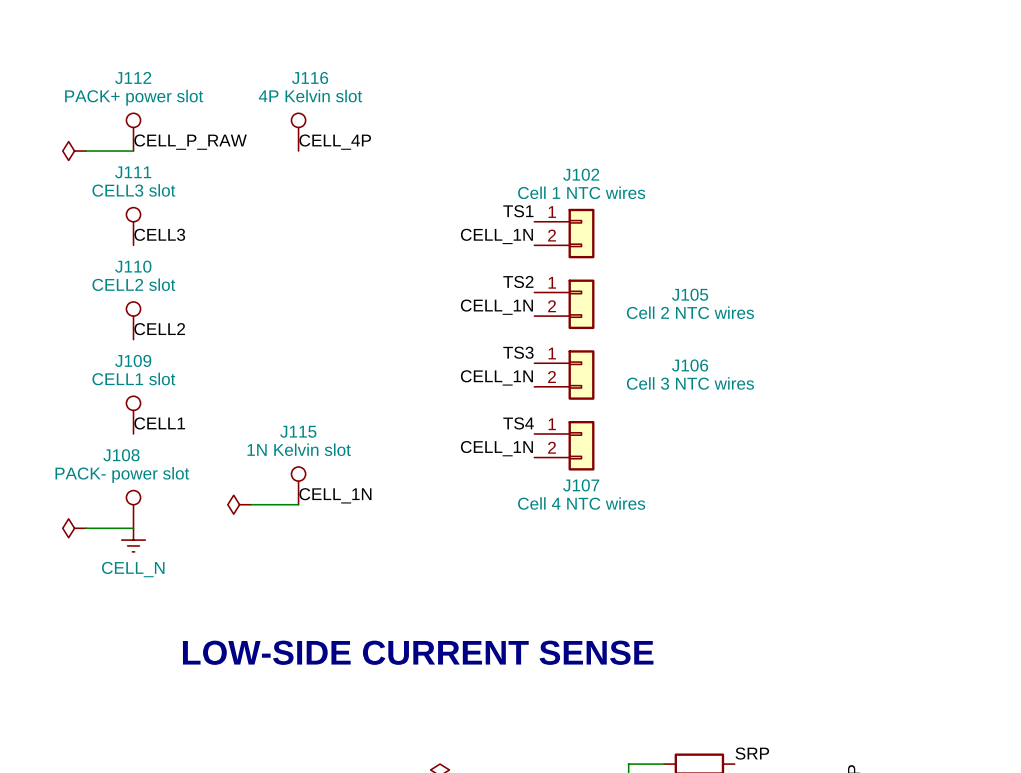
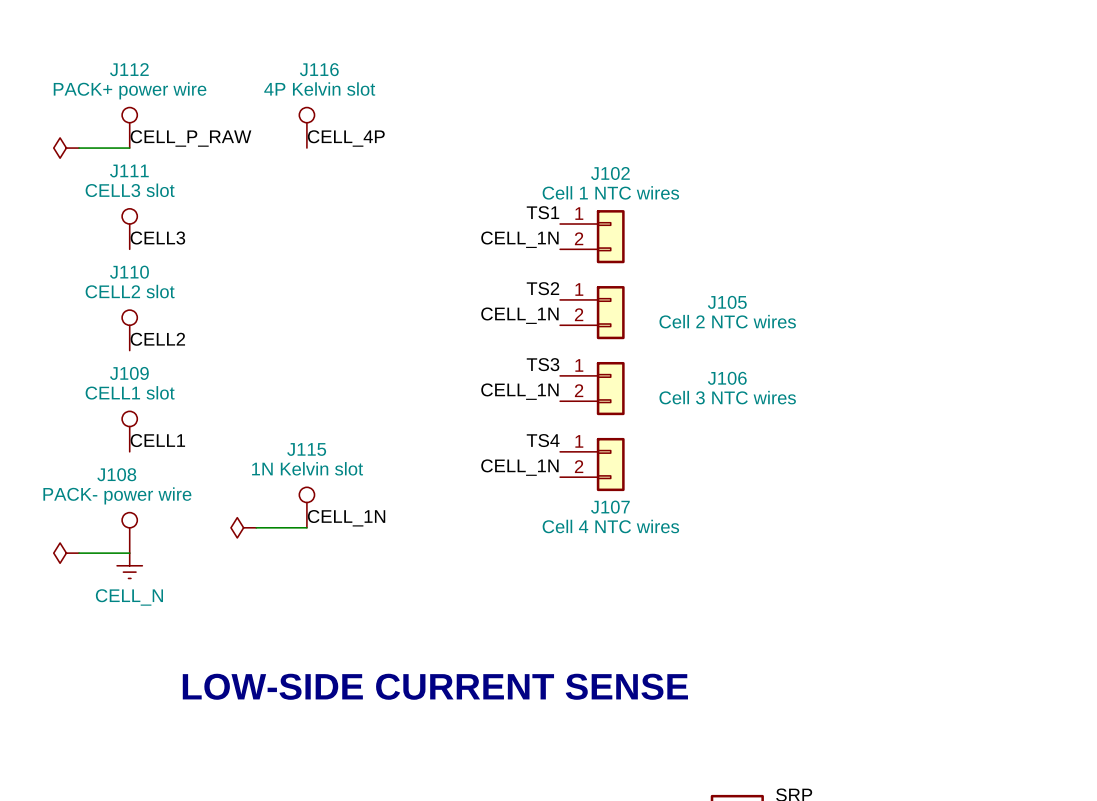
J112 value: PACK+ power slot (134, 97) -> PACK+ power wire (130, 90)
J108 value: PACK- power slot (122, 475) -> PACK- power wire (117, 495)

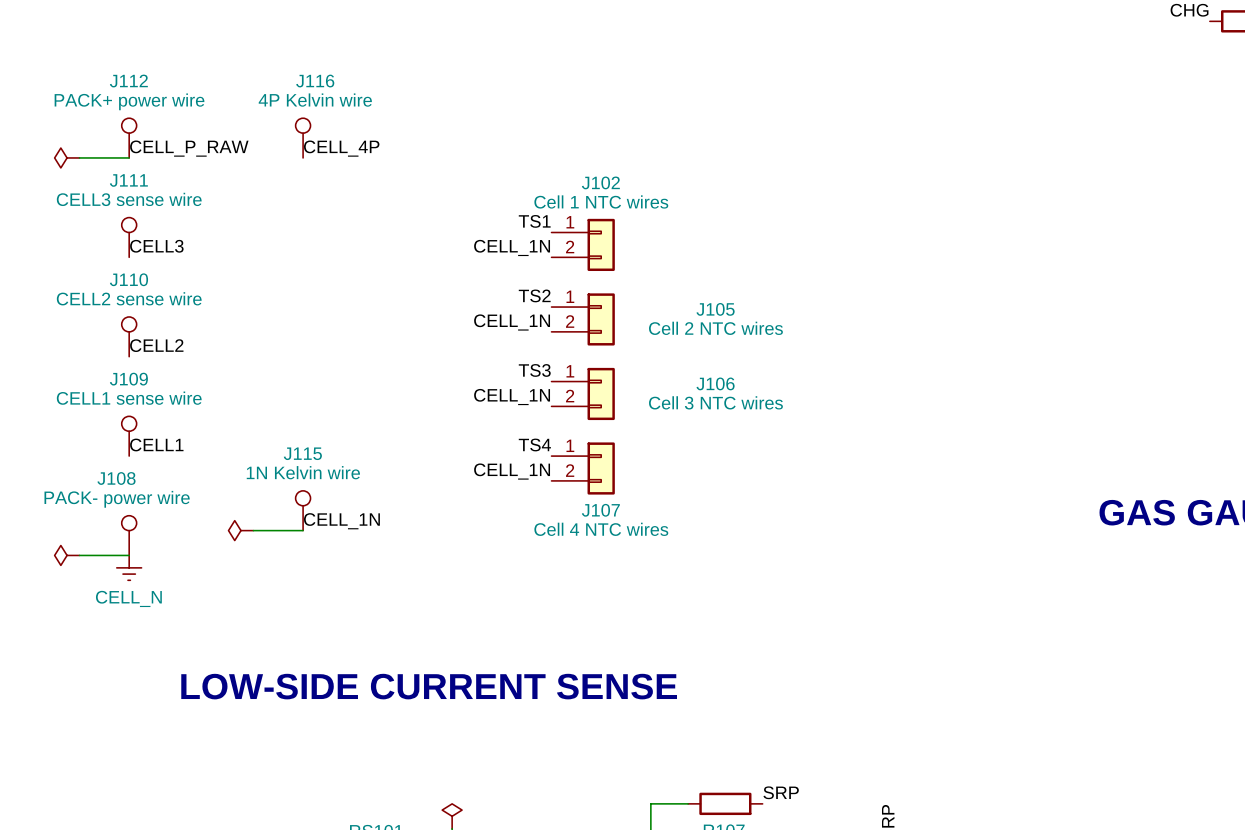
J116 value: 4P Kelvin slot (319, 89) -> 4P Kelvin wire (315, 100)
J111 value: CELL3 slot (130, 190) -> CELL3 sense wire (129, 199)
J110 value: CELL2 slot (130, 291) -> CELL2 sense wire (129, 298)
J109 value: CELL1 slot (130, 392) -> CELL1 sense wire (129, 398)
J115 value: 1N Kelvin slot (307, 468) -> 1N Kelvin wire (303, 472)

